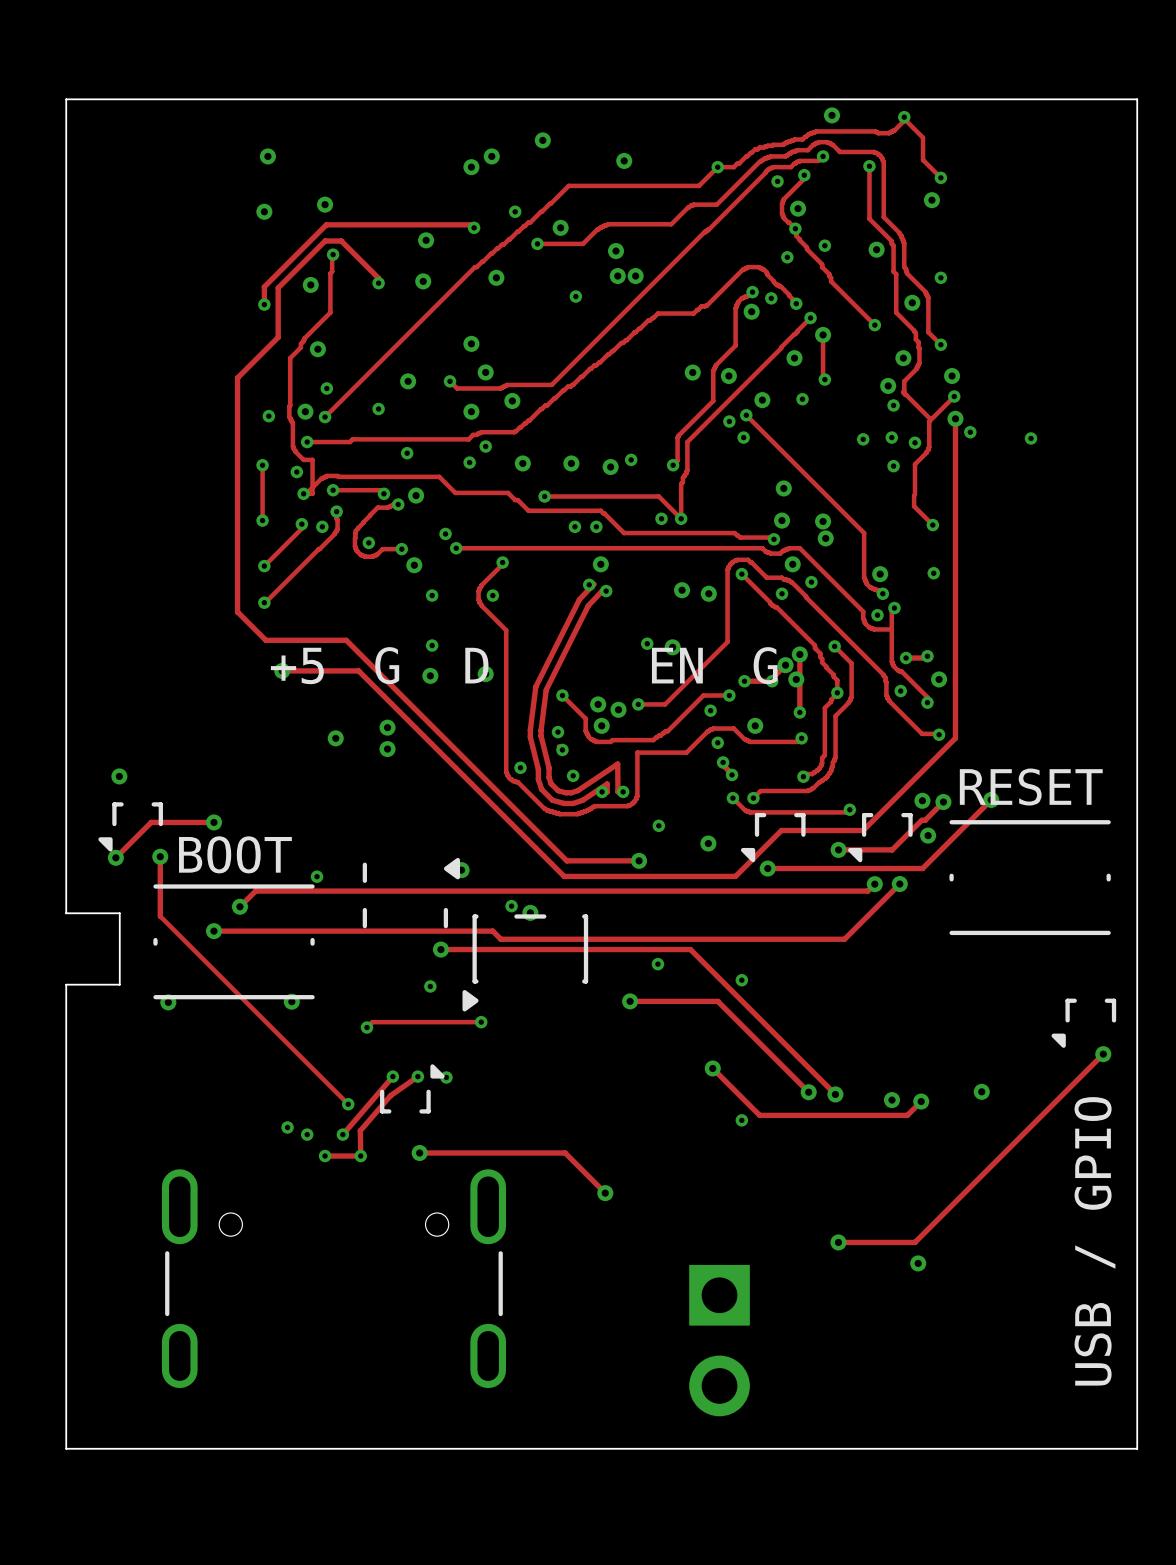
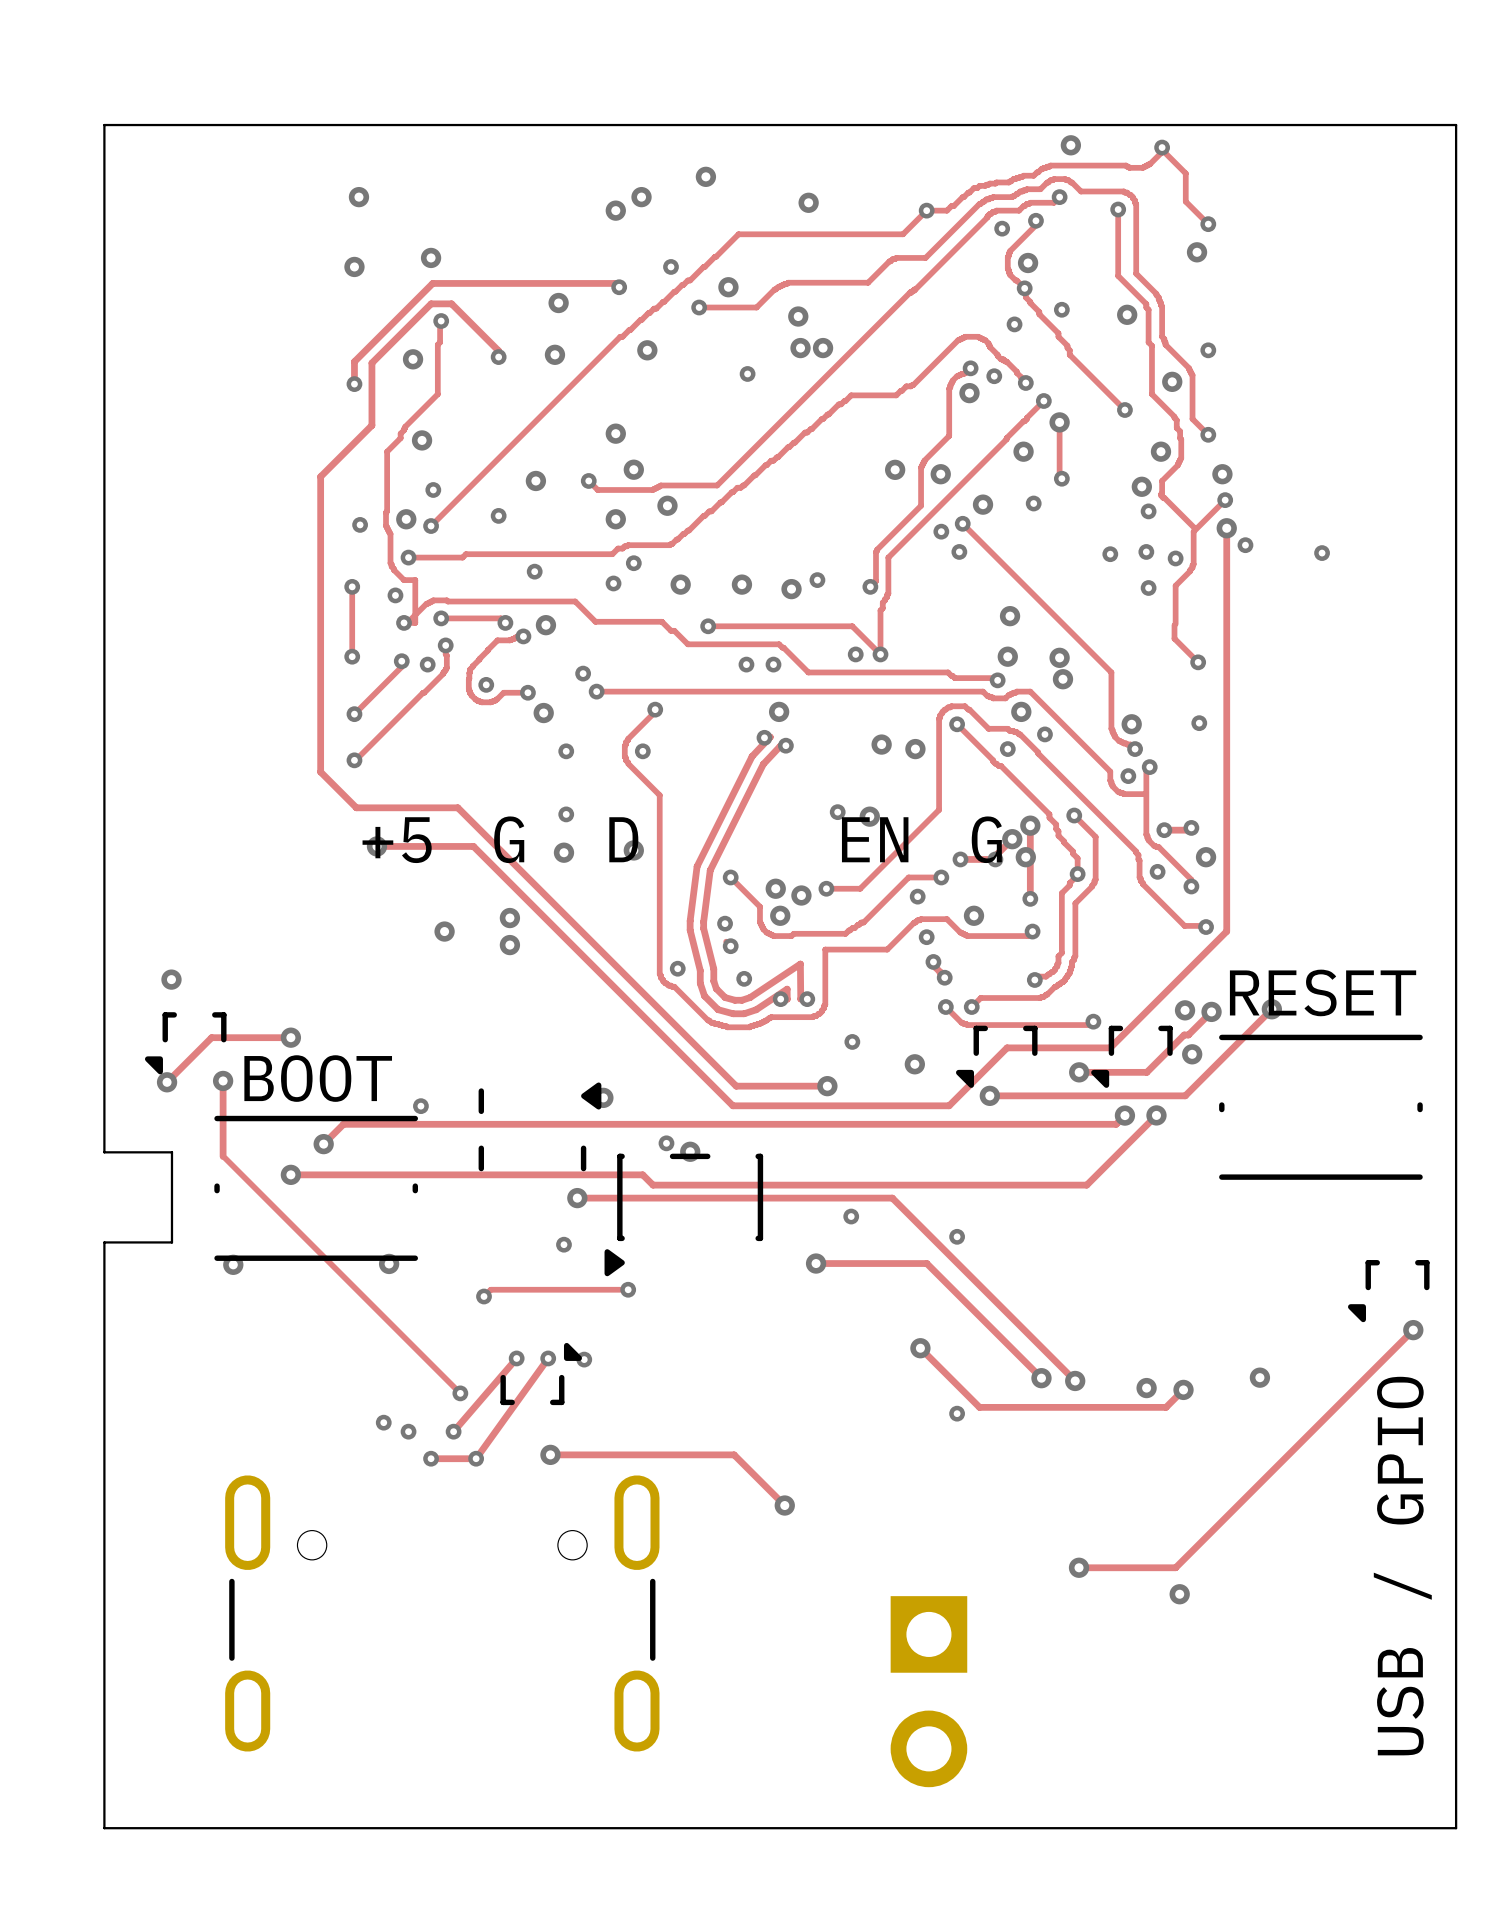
track: (417, 1076) (390, 1095) (360, 1130) (360, 1156) -> (548, 1358) (476, 1458)

